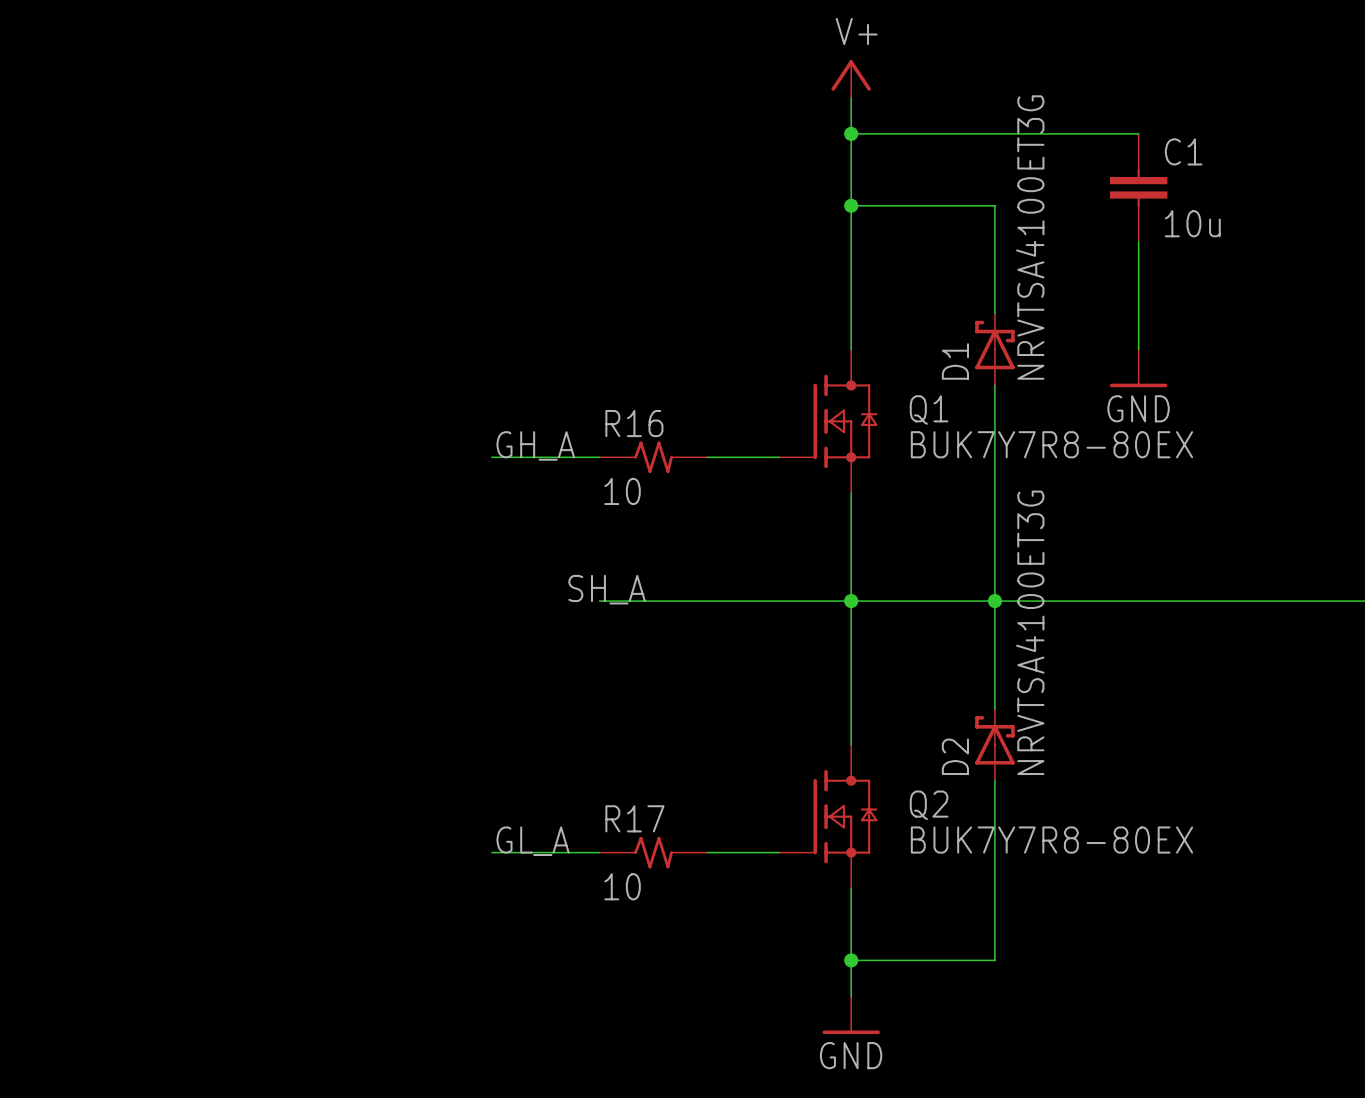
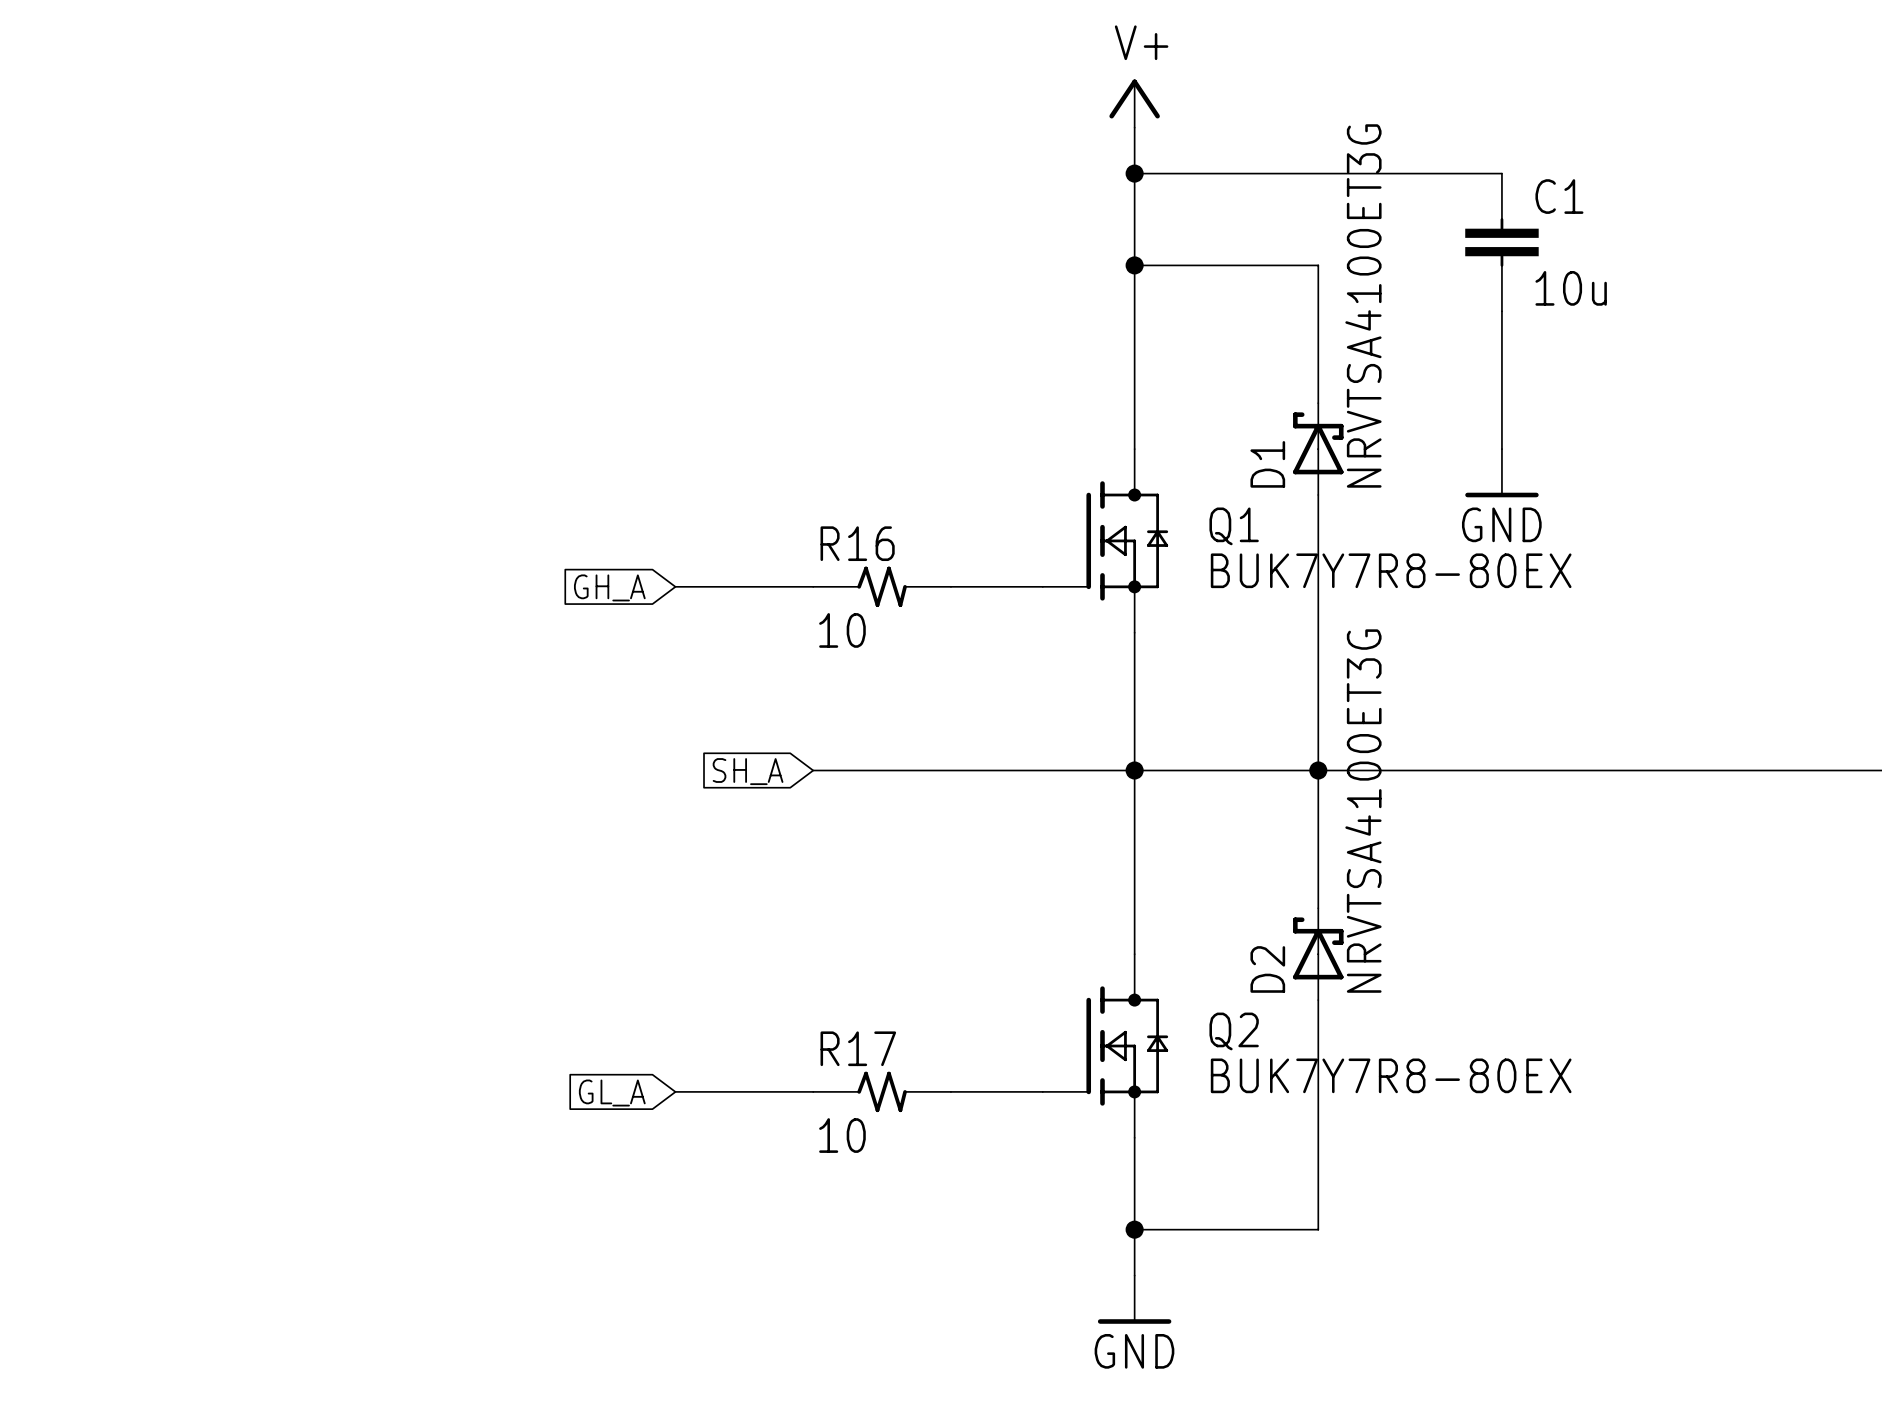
label: GH_A (535, 445) -> none
global label: none -> GH_A (609, 587)
label: SH_A (607, 589) -> none
global label: none -> SH_A (748, 771)
label: GL_A (533, 841) -> none
global label: none -> GL_A (612, 1093)

